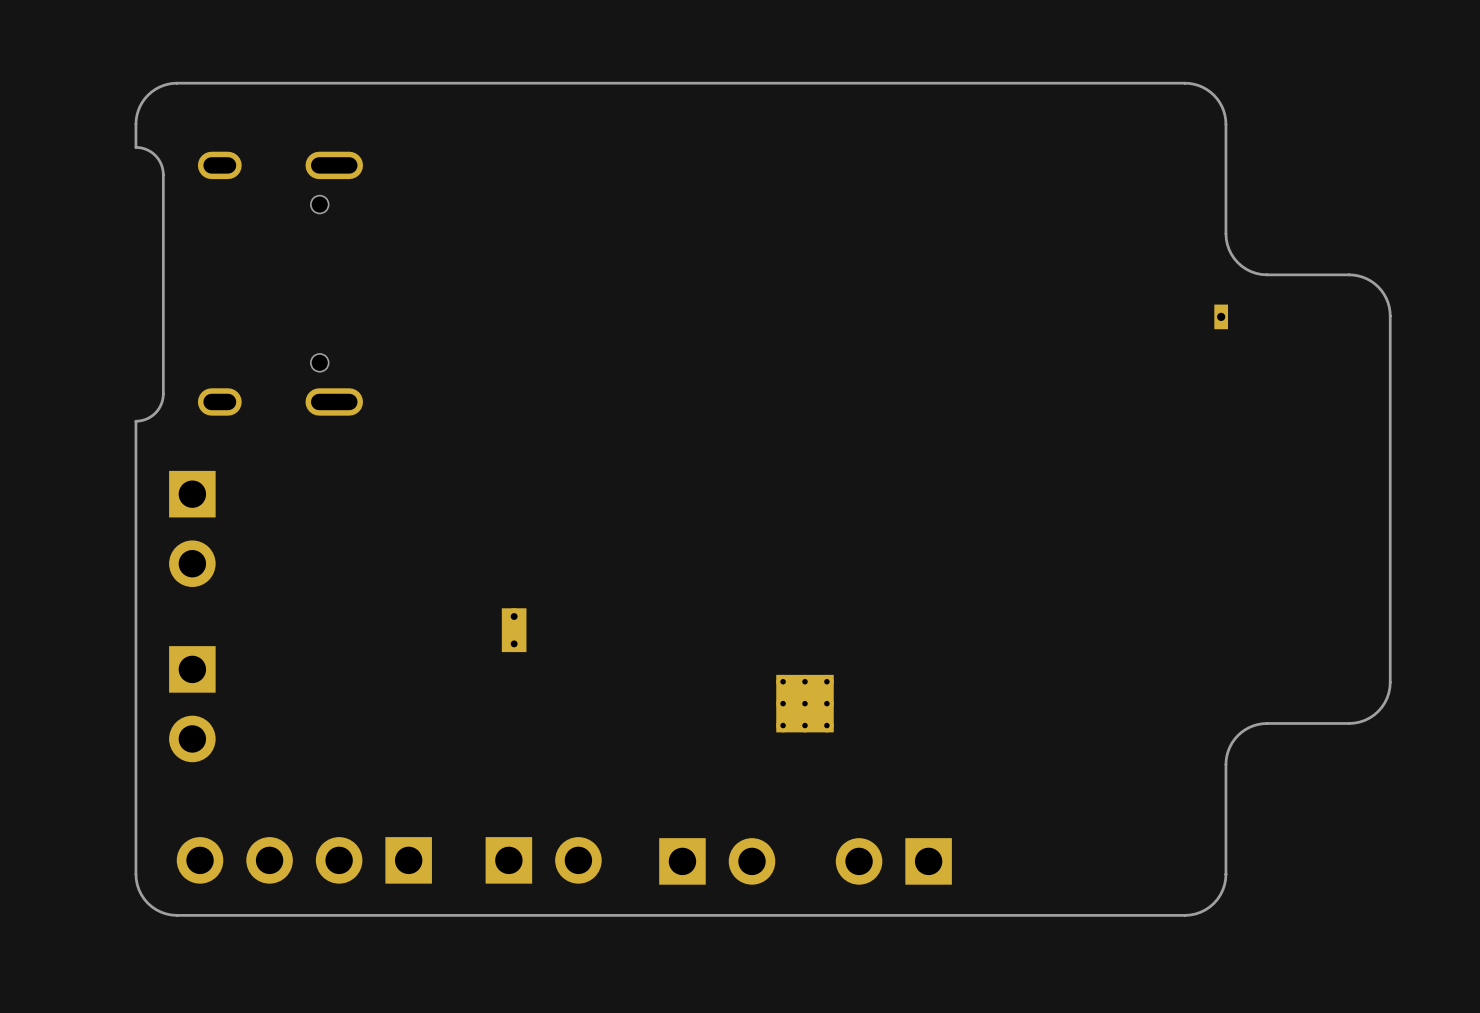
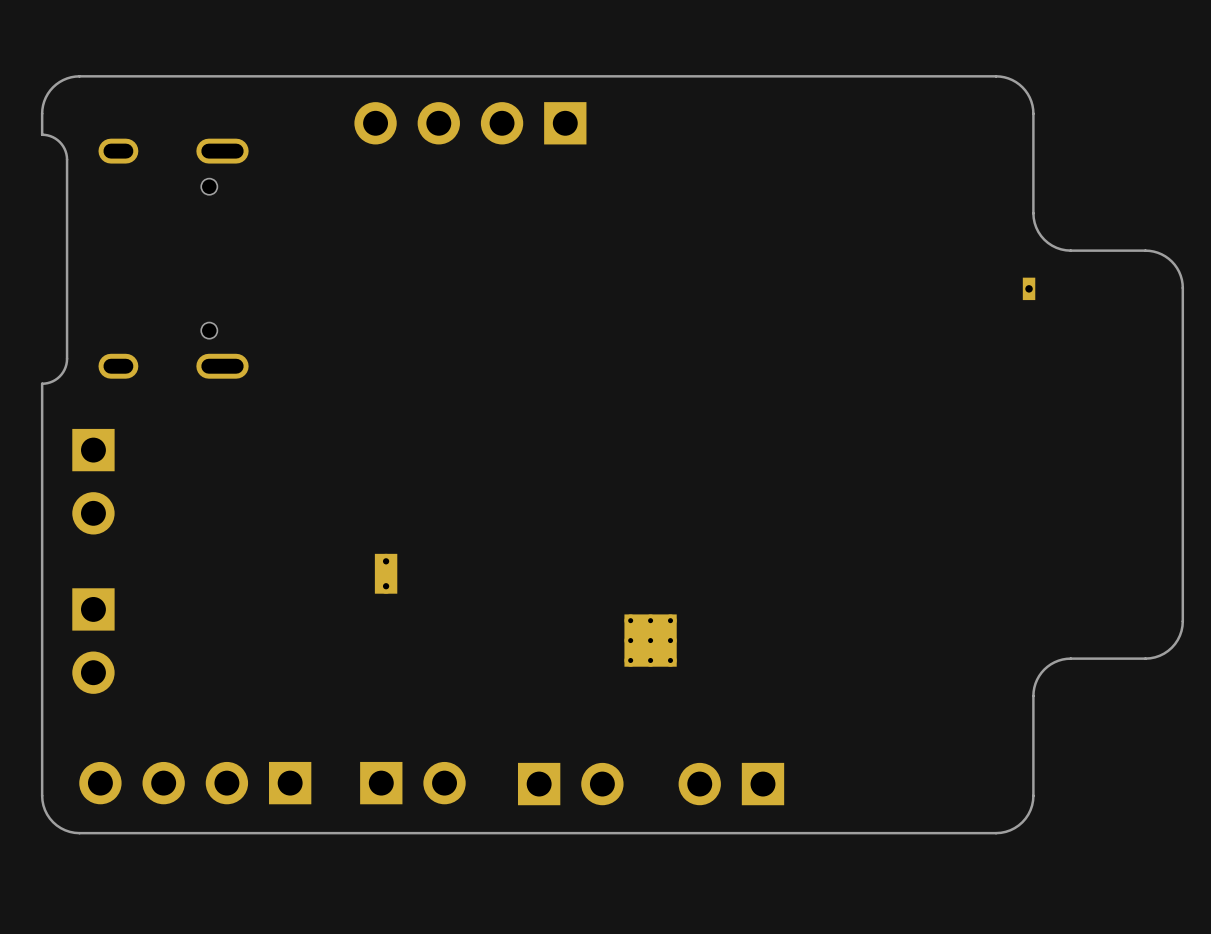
part: none -> (470, 123)

